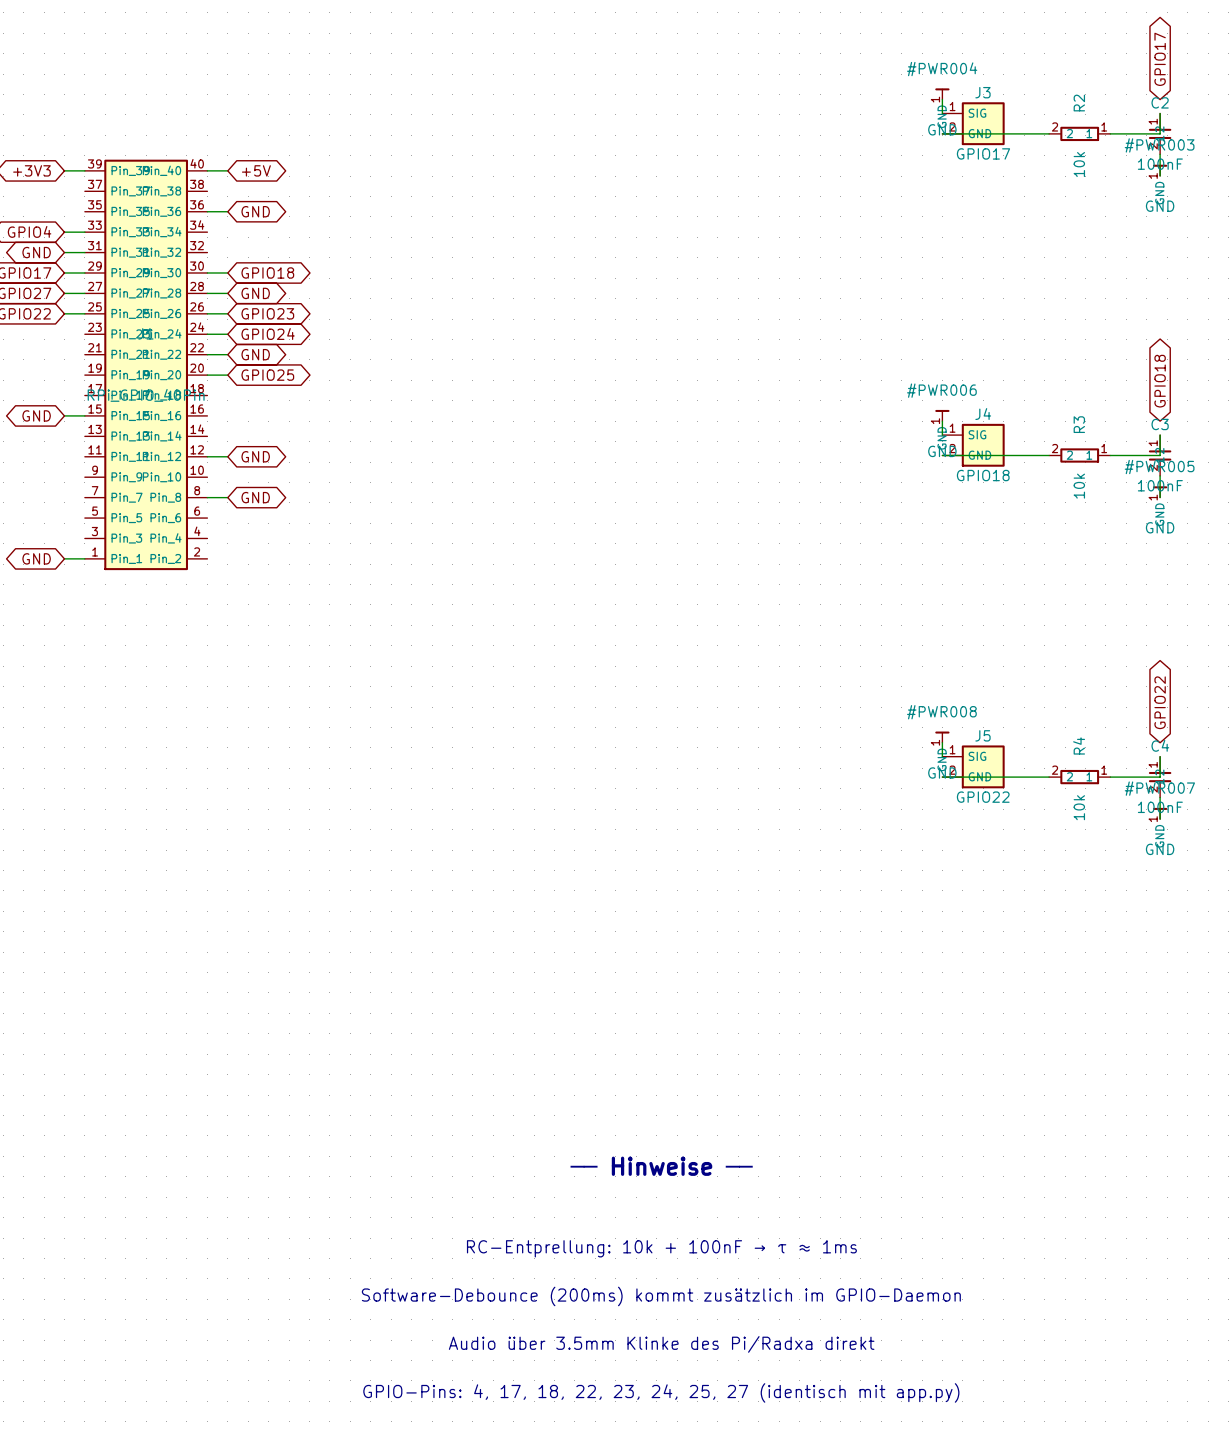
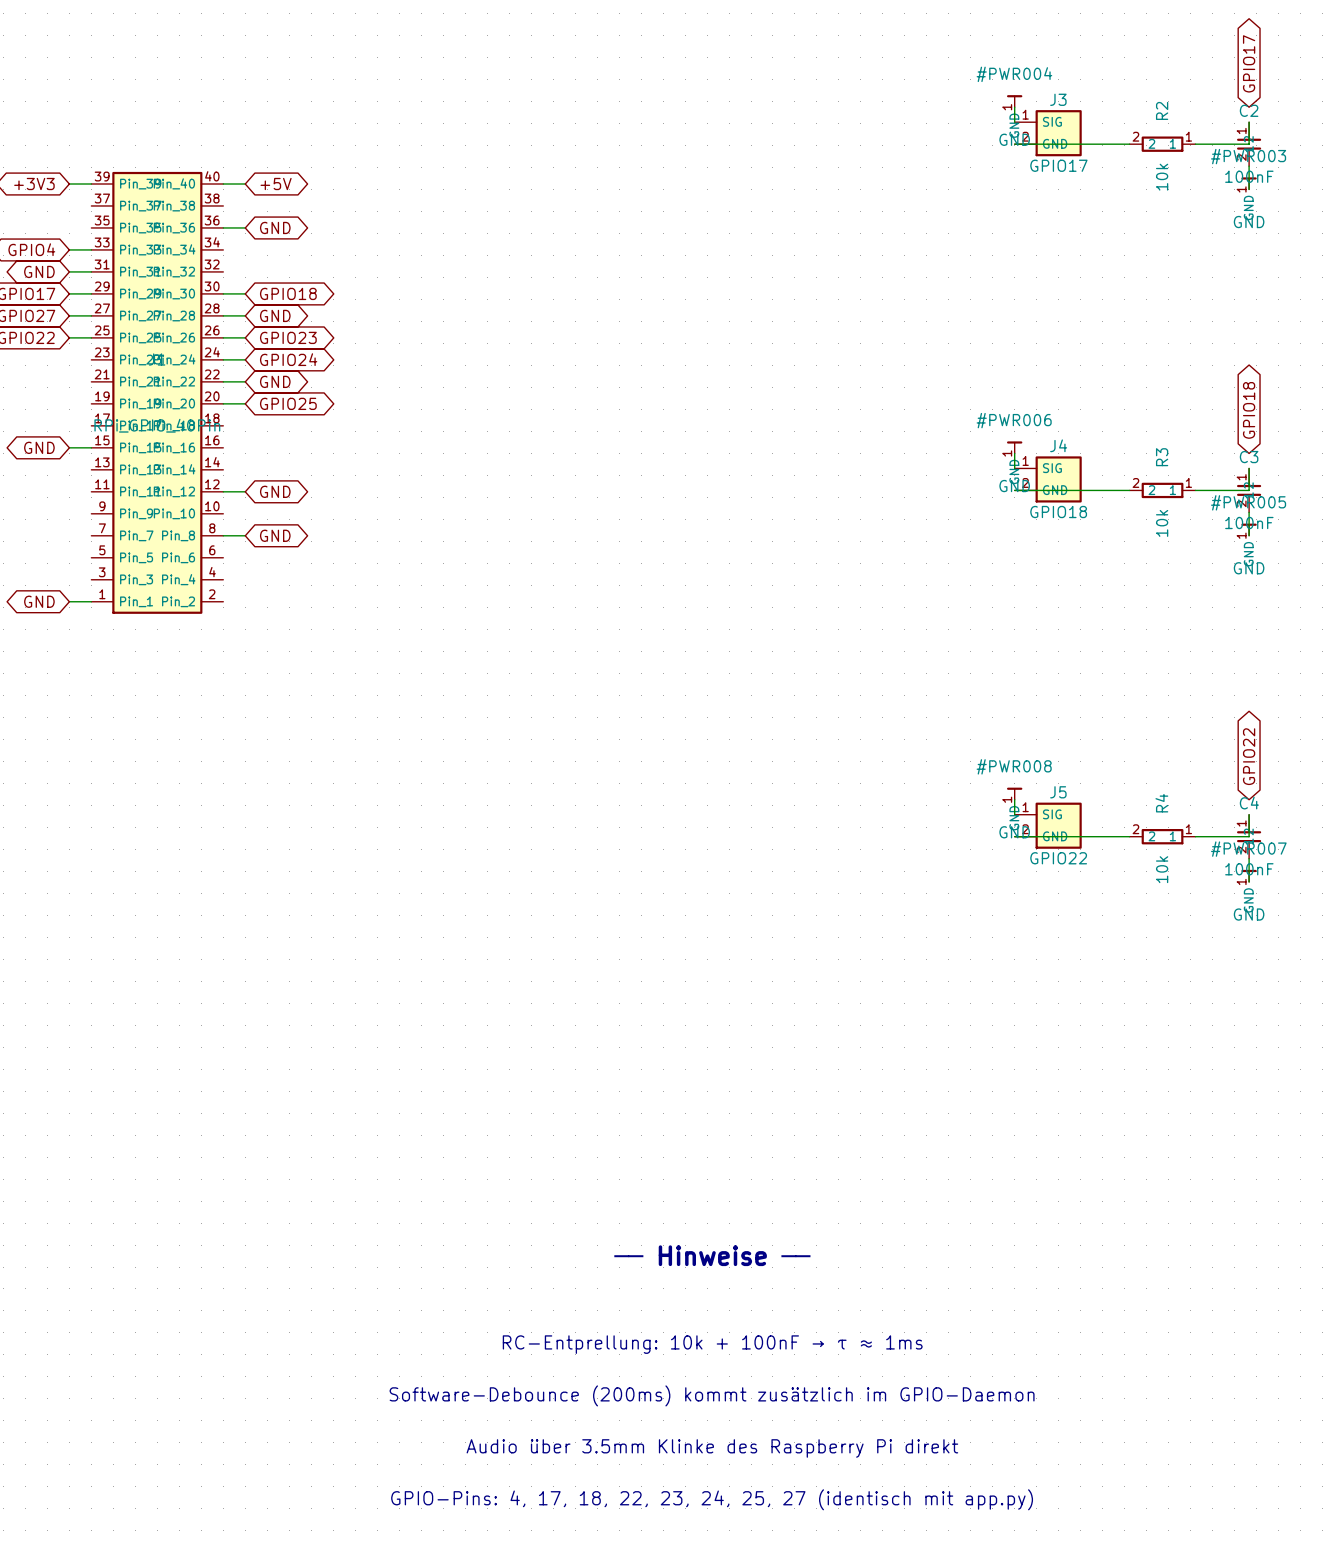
text: Audio über 3.5mm Klinke des Pi/Radxa direkt (661, 1344) -> Audio über 3.5mm Klinke des Raspberry Pi direkt (712, 1448)

